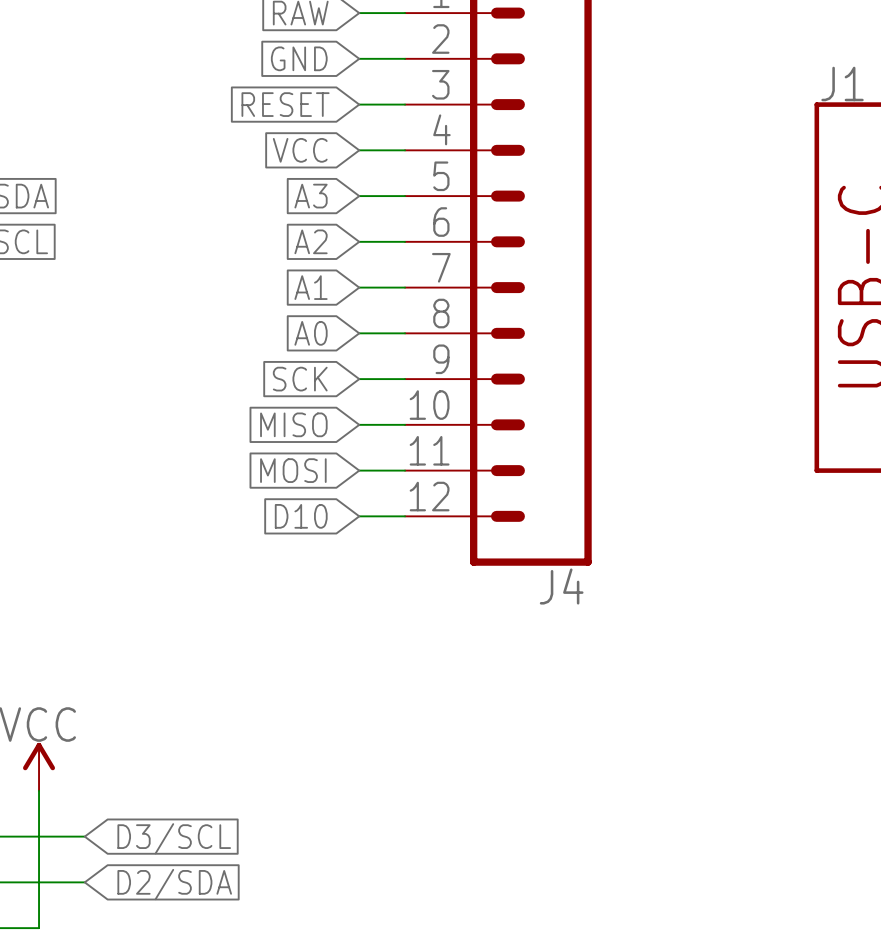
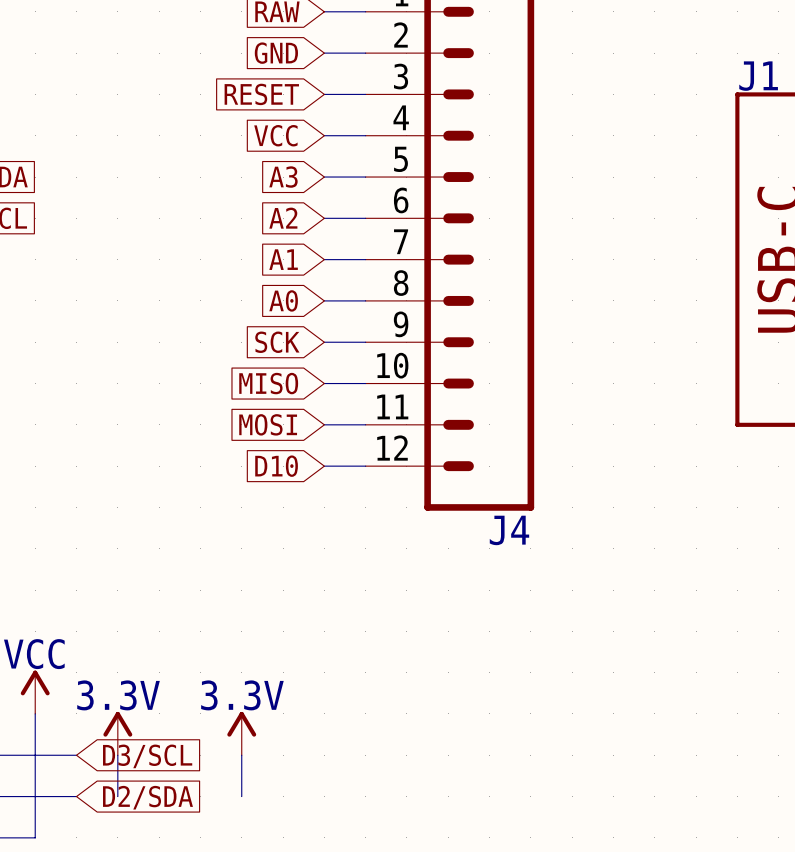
power symbol: none -> 3.3V (117, 733)
power symbol: none -> 3.3V (241, 733)
wire: none -> (117, 755) (117, 796)
wire: none -> (241, 755) (241, 796)

